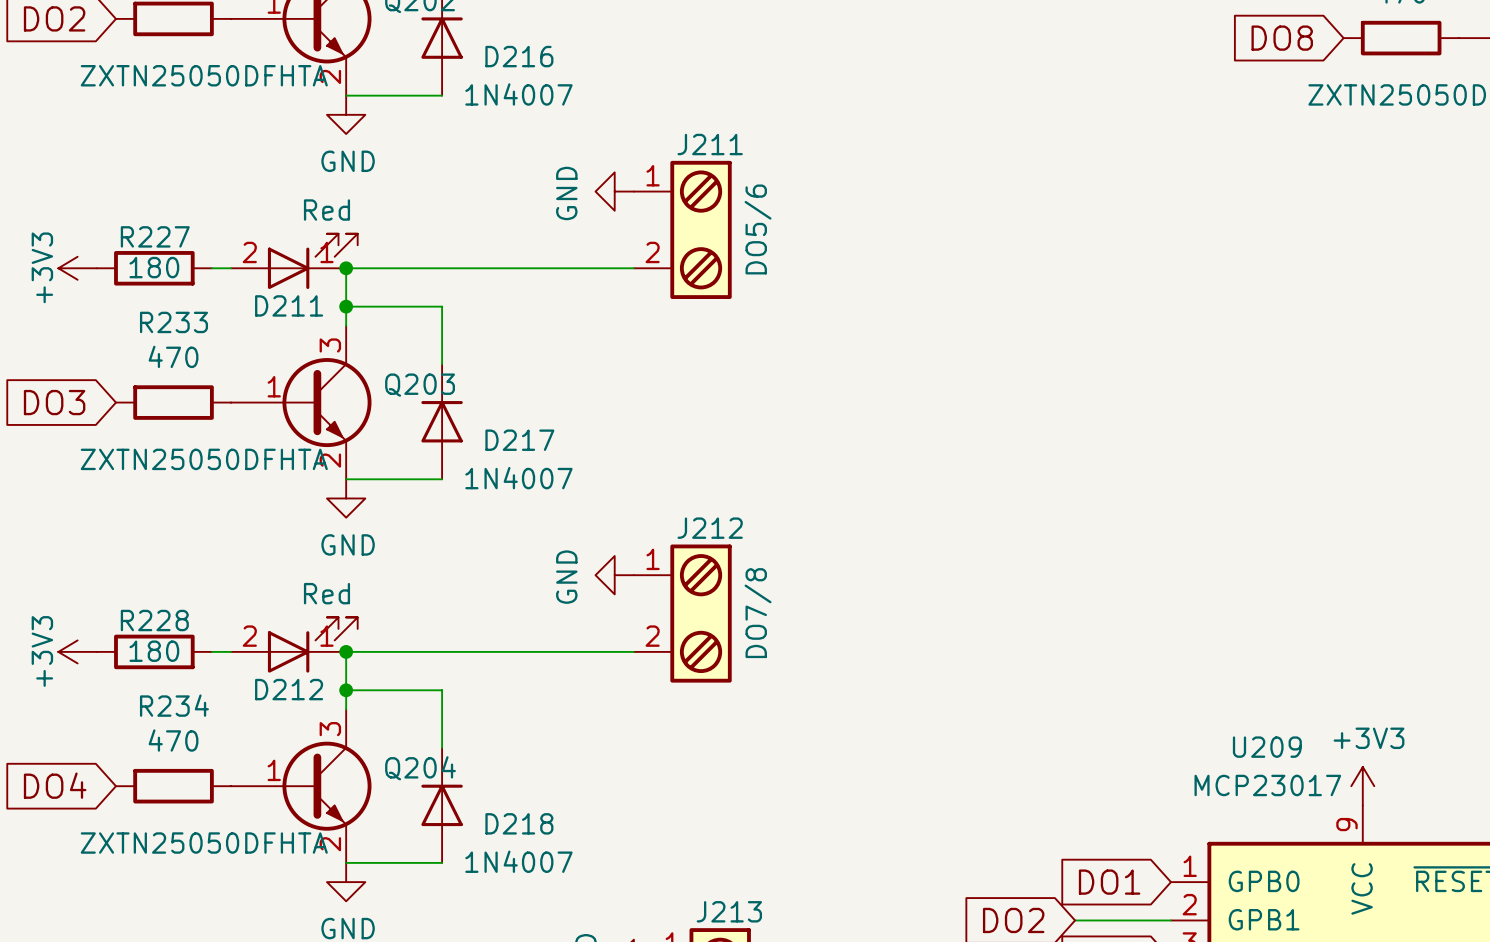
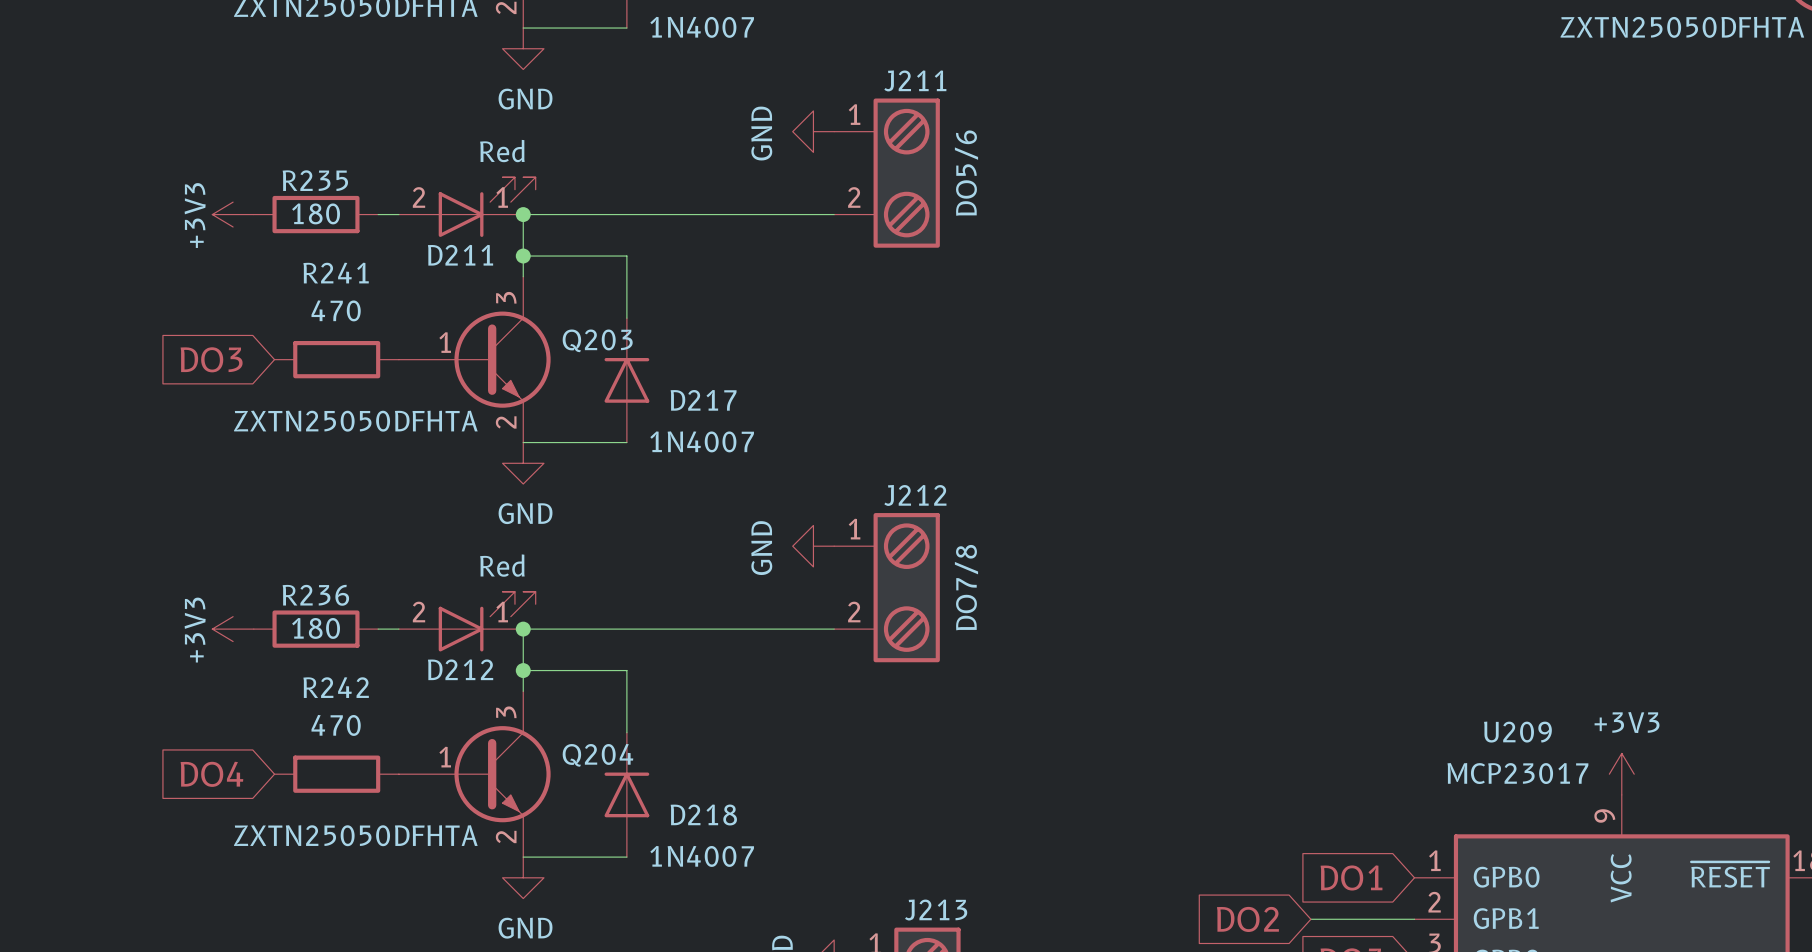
R227 name: R227 (155, 236) -> R235 (315, 180)
R233 name: R233 (173, 322) -> R241 (336, 273)
R228 name: R228 (154, 620) -> R236 (315, 595)
R234 name: R234 (174, 705) -> R242 (336, 687)

